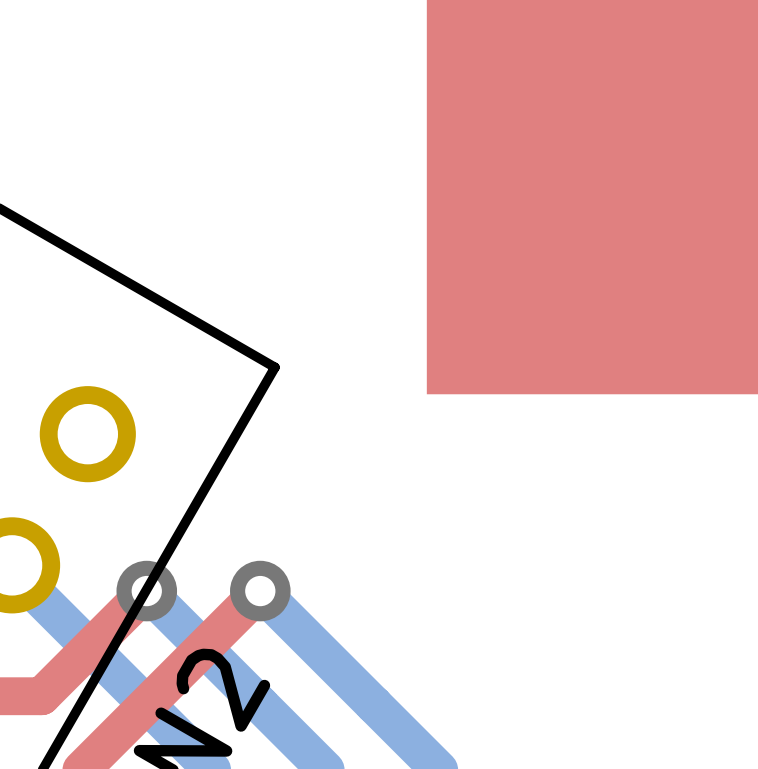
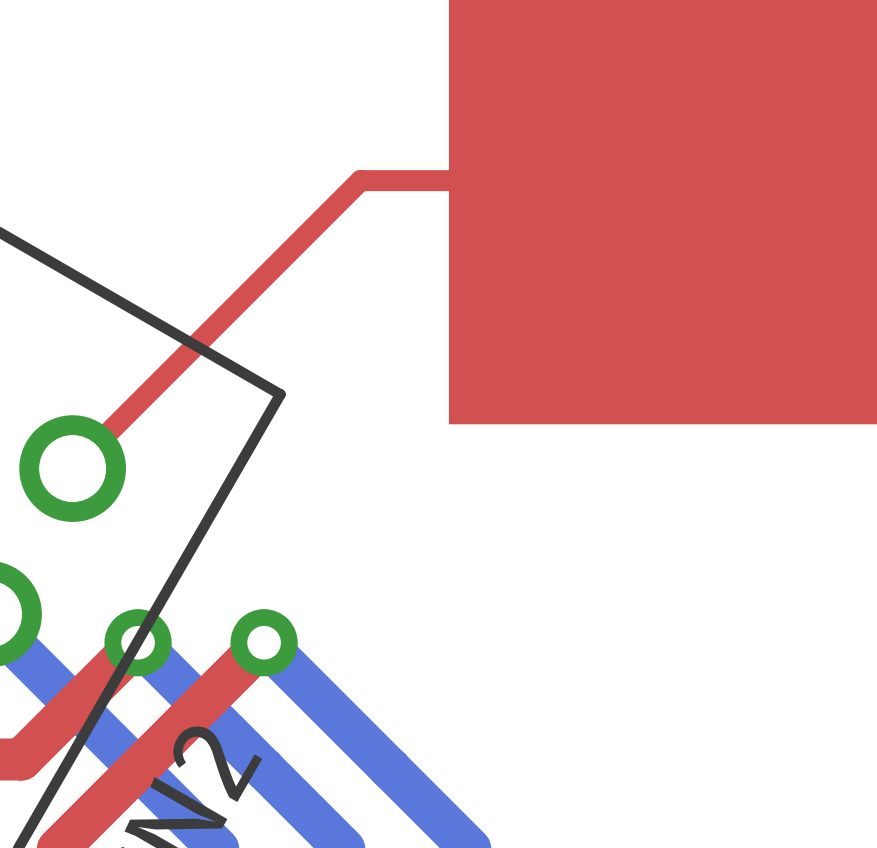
top track: none -> (717, 180) (360, 180) (72, 468)

